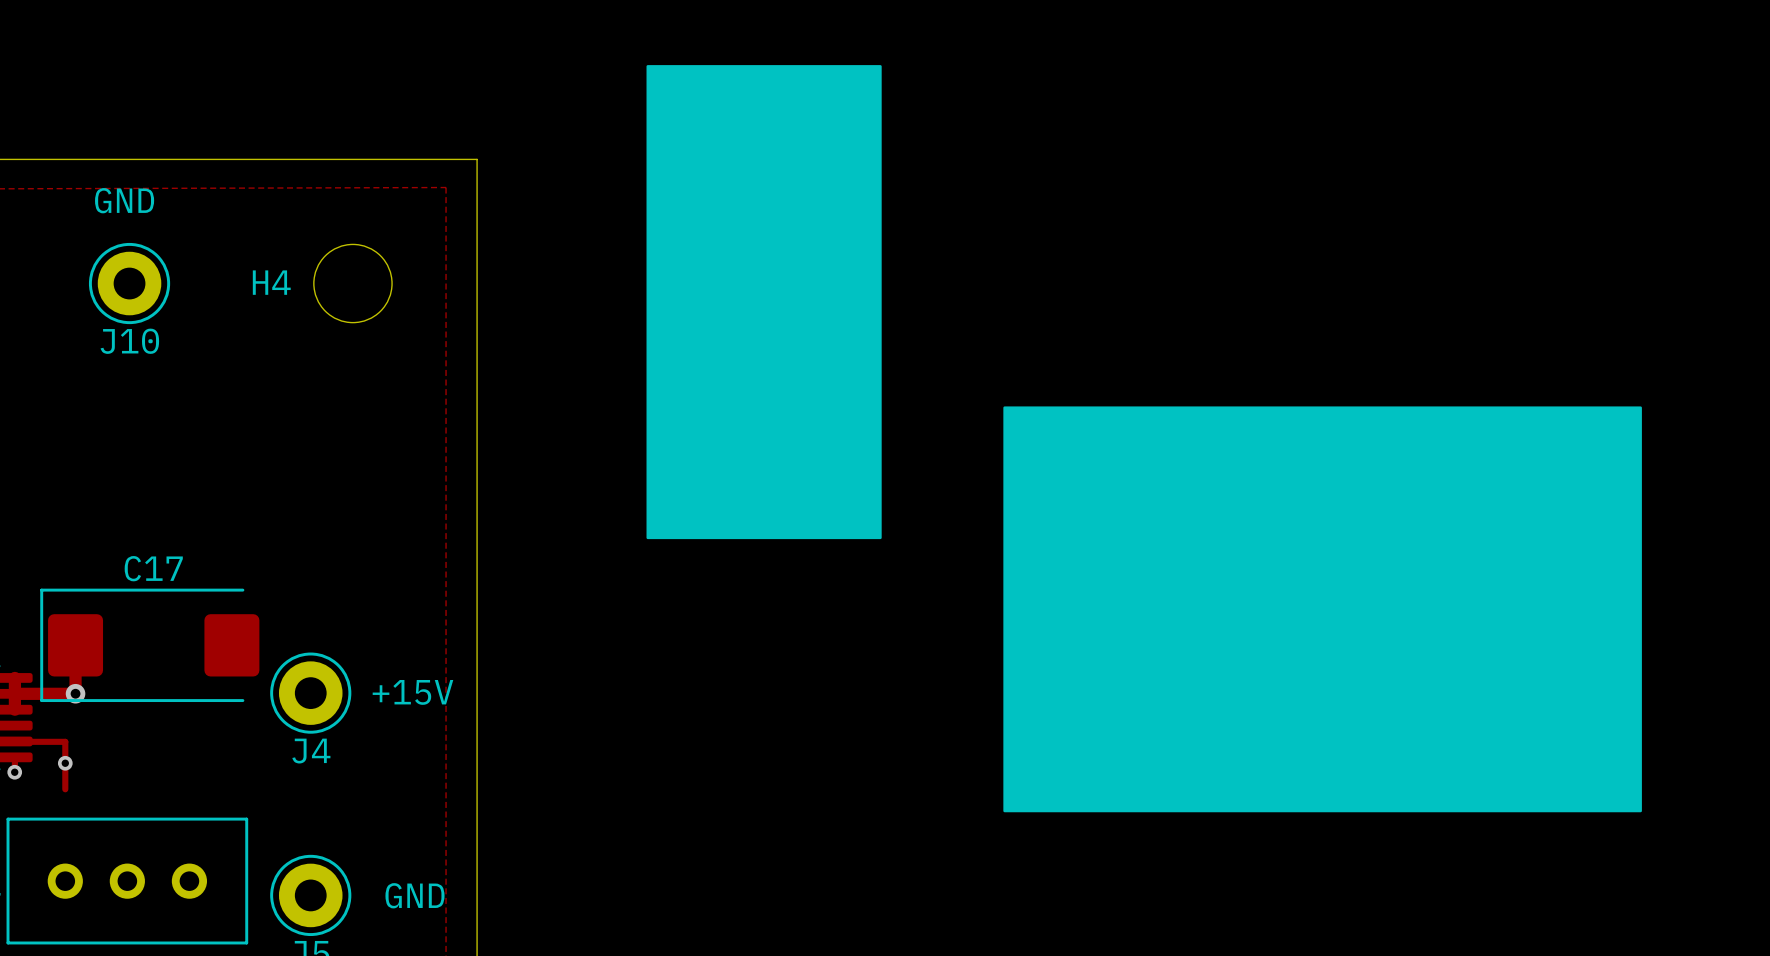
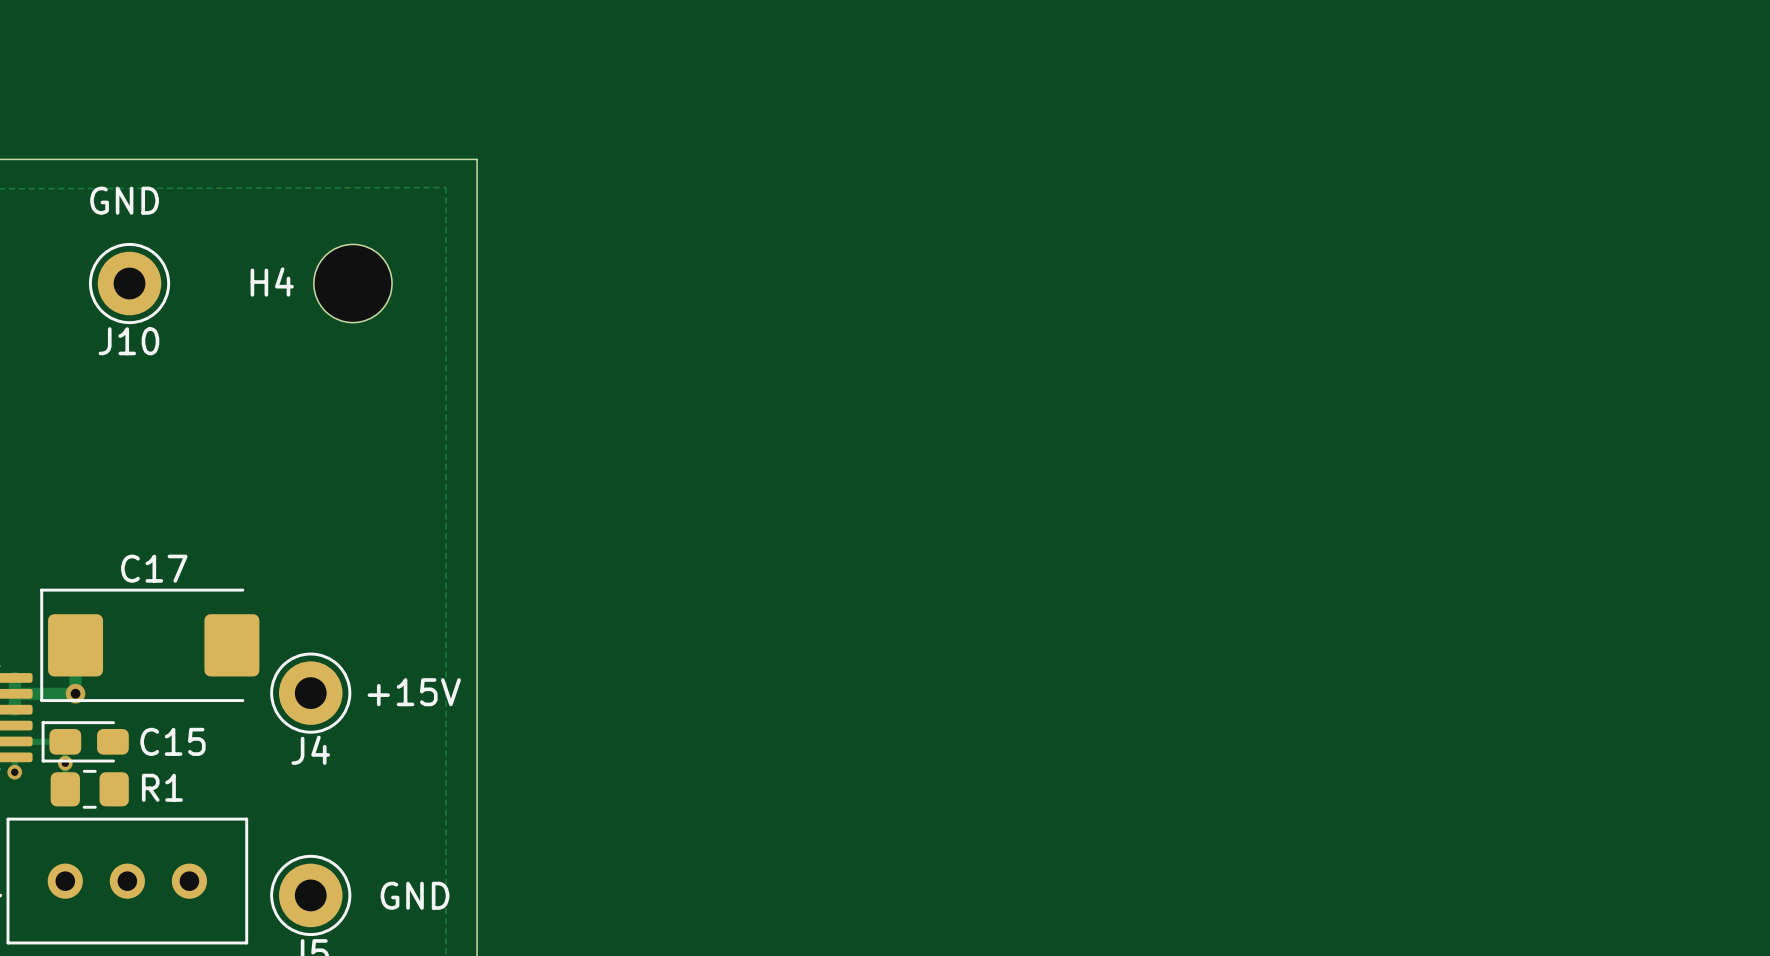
drawing: [646, 65, 882, 540] -> none
drawing: [1003, 406, 1642, 813] -> none
C15: none -> (85, 741)
R1: none -> (89, 789)

